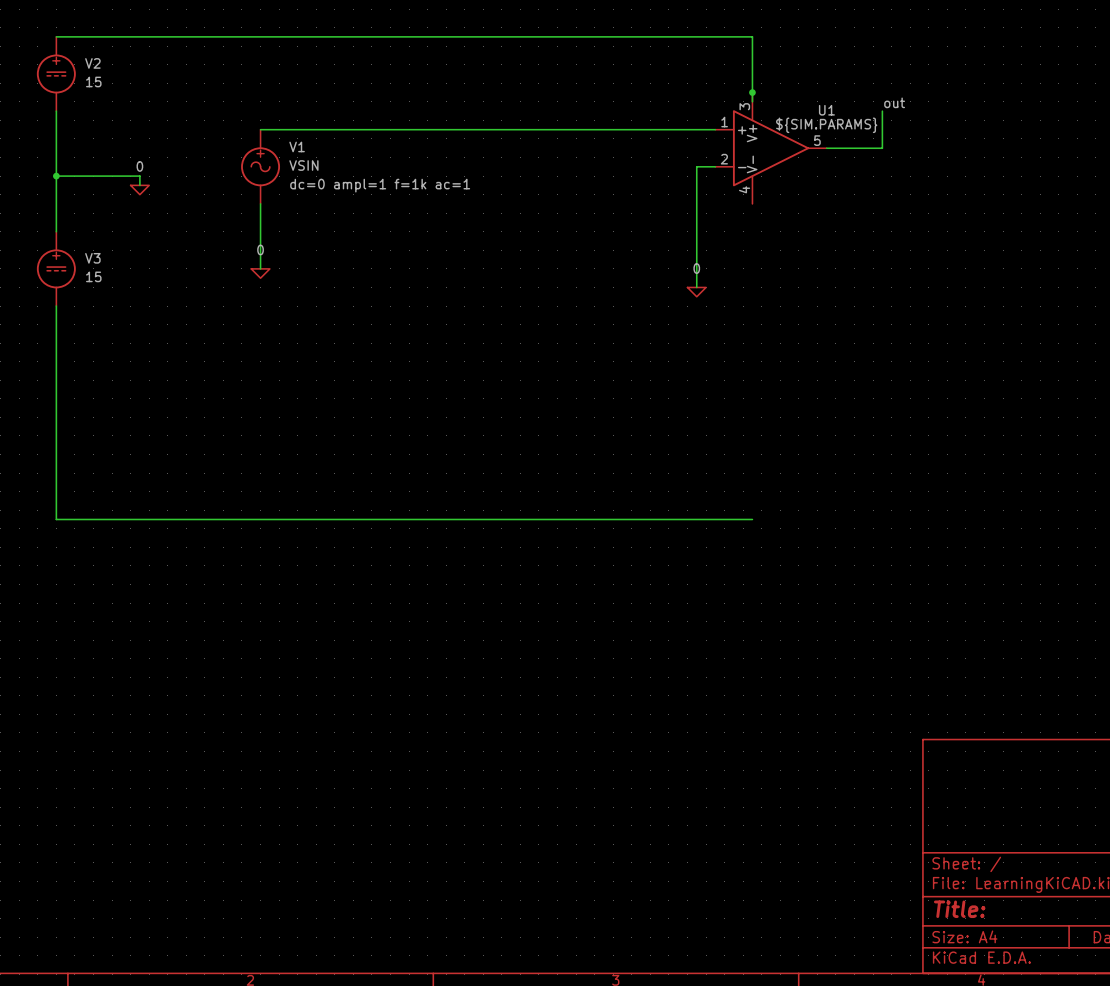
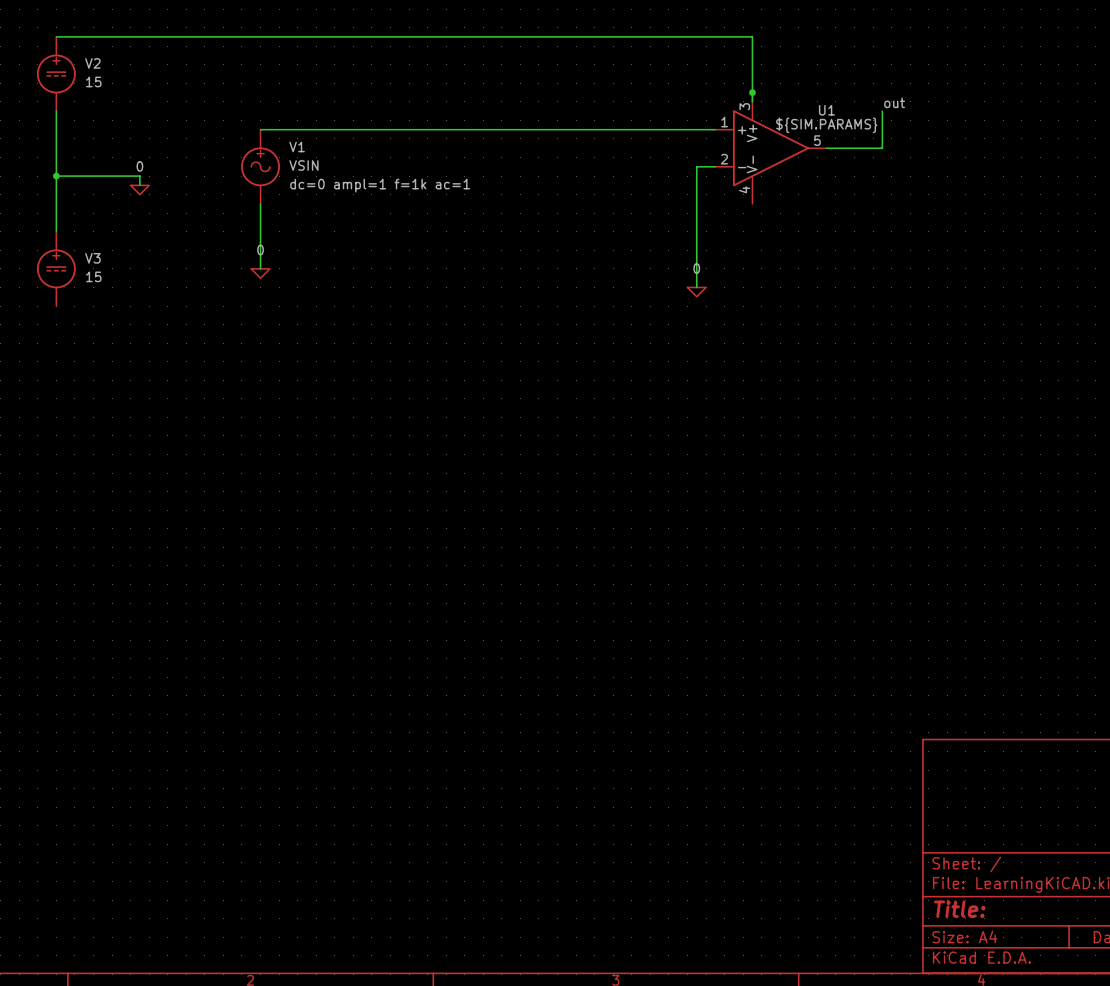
wire: (56, 306) (56, 519) (752, 519) -> none

